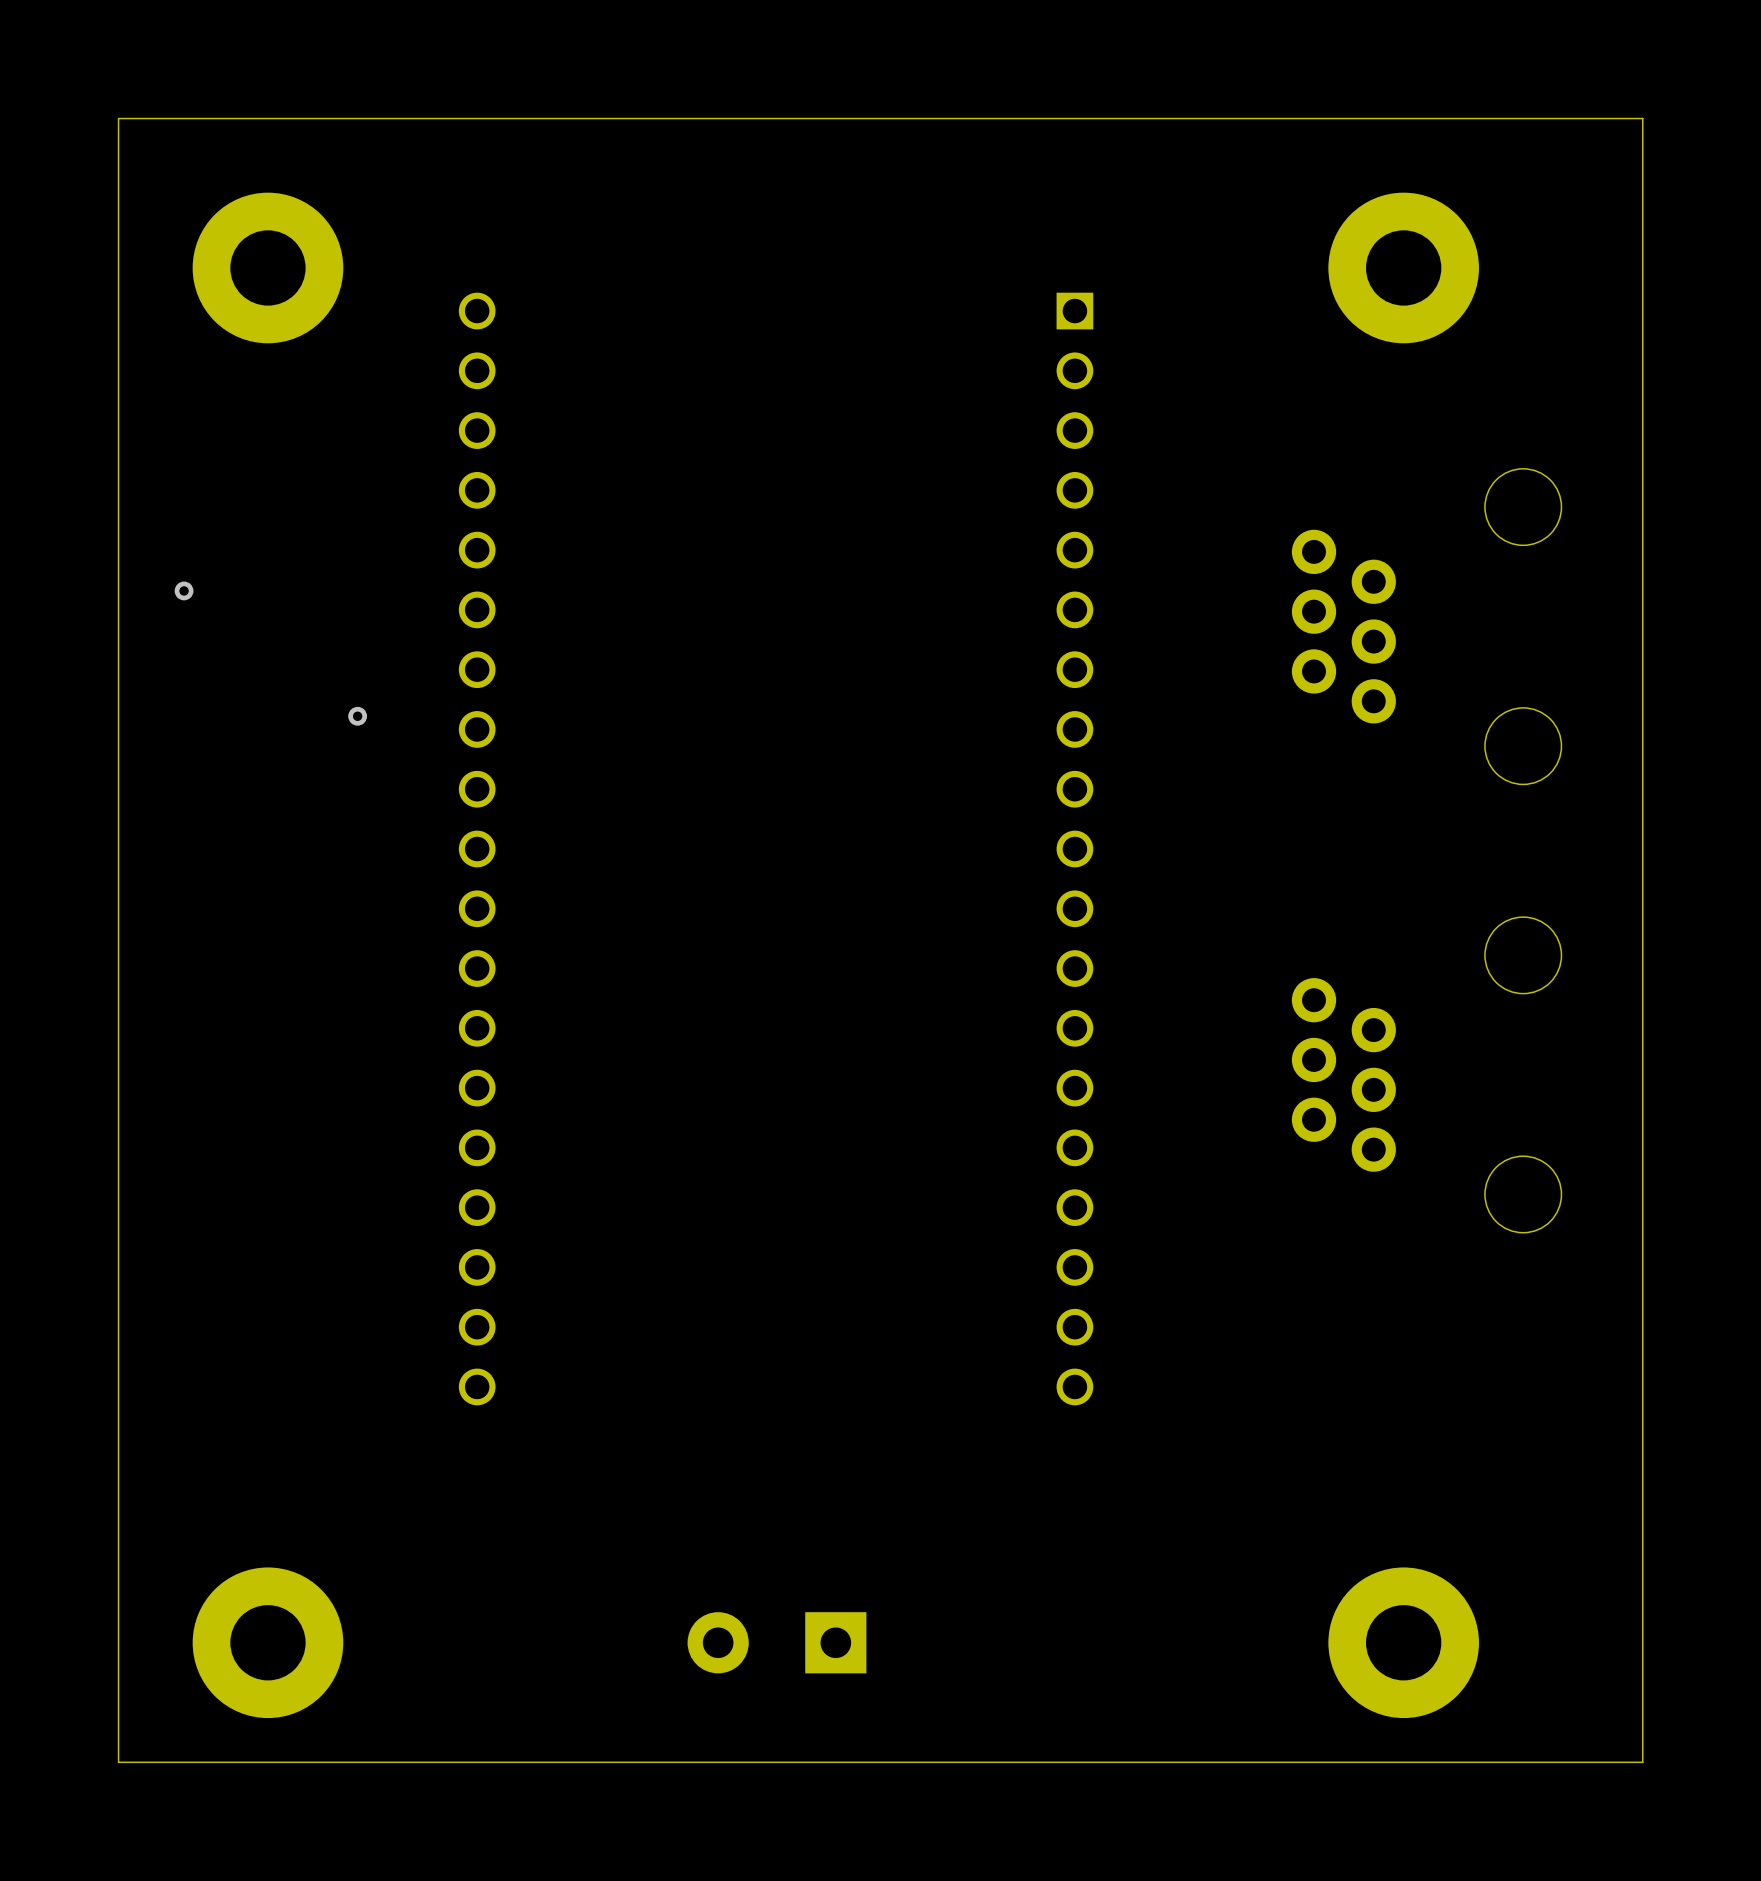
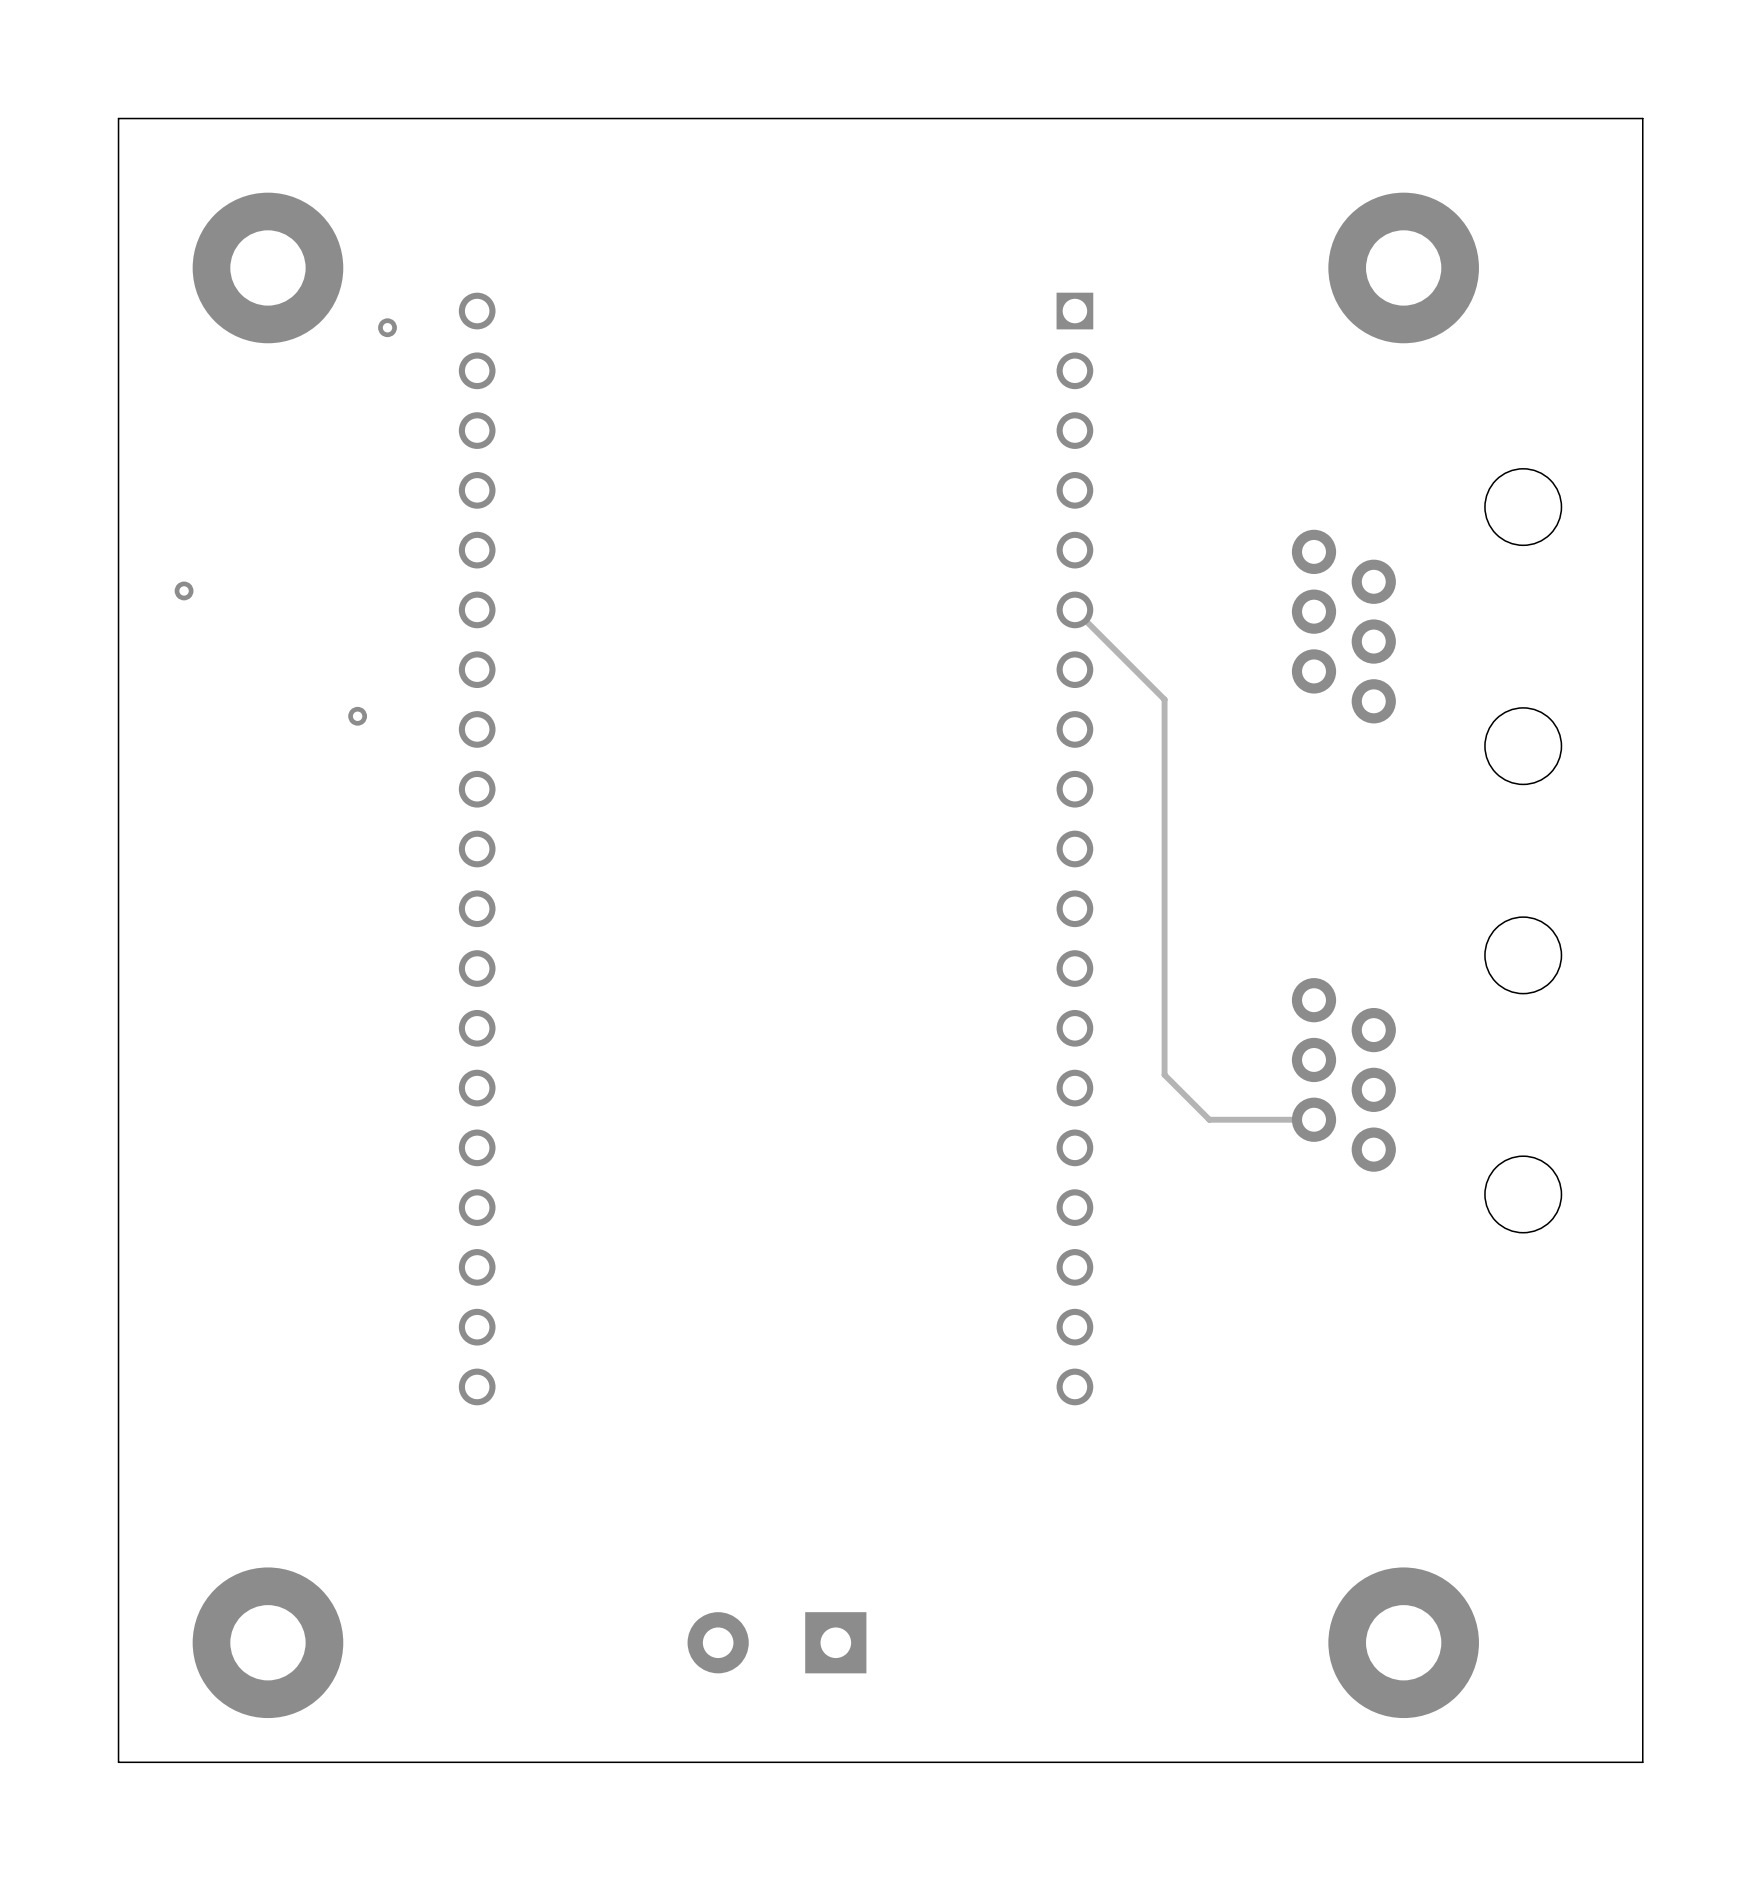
via: none -> (387, 327)
track: none -> (1074, 609) (1164, 699) (1164, 1074) (1209, 1119) (1314, 1119)

